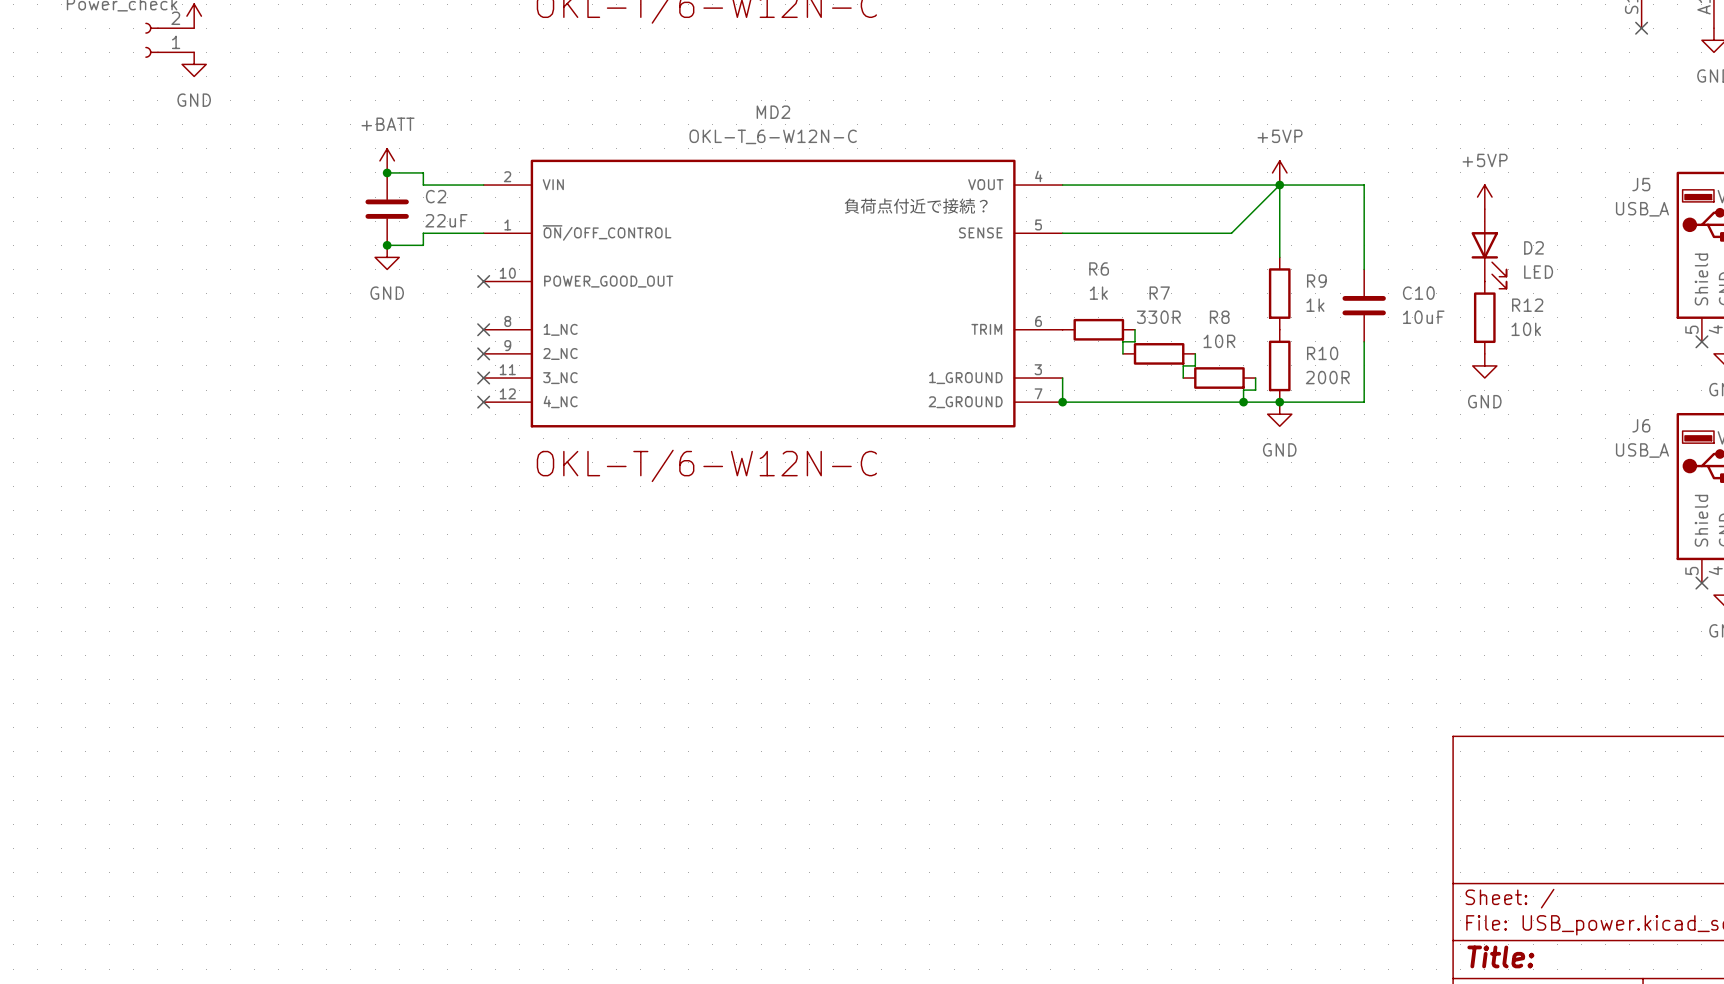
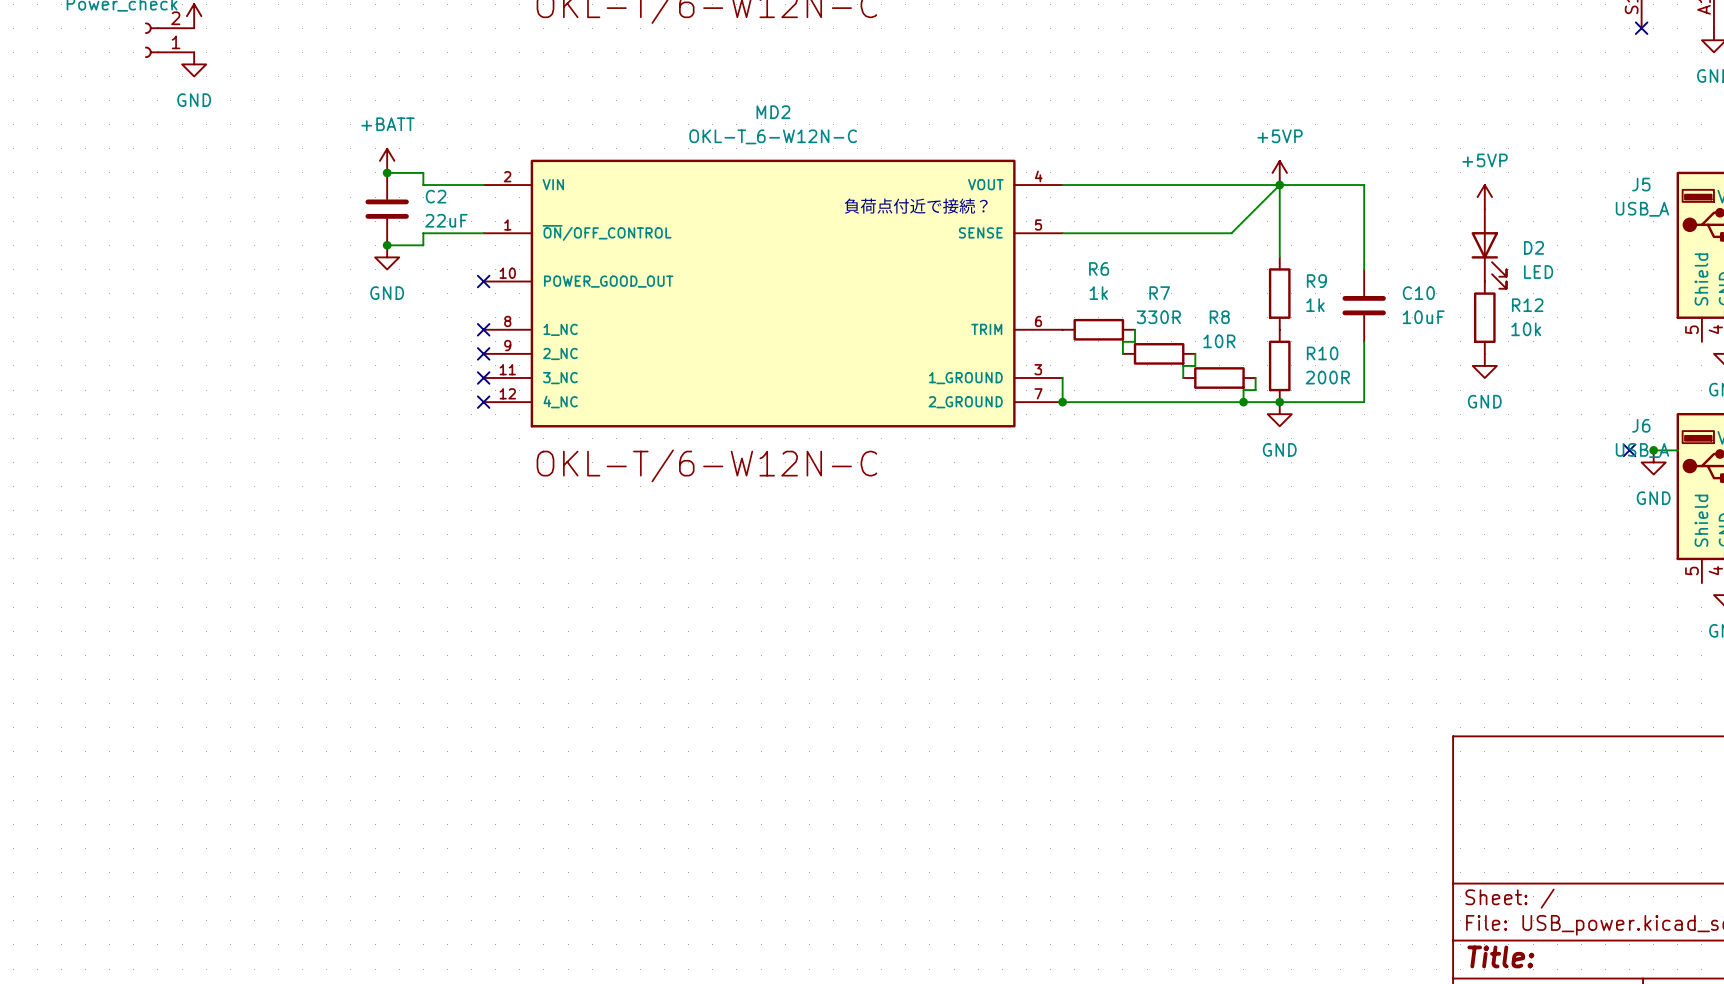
no-connect mark: (1701, 341) -> none
no-connect mark: none -> (1629, 450)
wire: none -> (1653, 450) (1677, 450)
junction: none -> (1653, 450)
power symbol: none -> GND (1653, 462)
no-connect mark: (1701, 583) -> none

